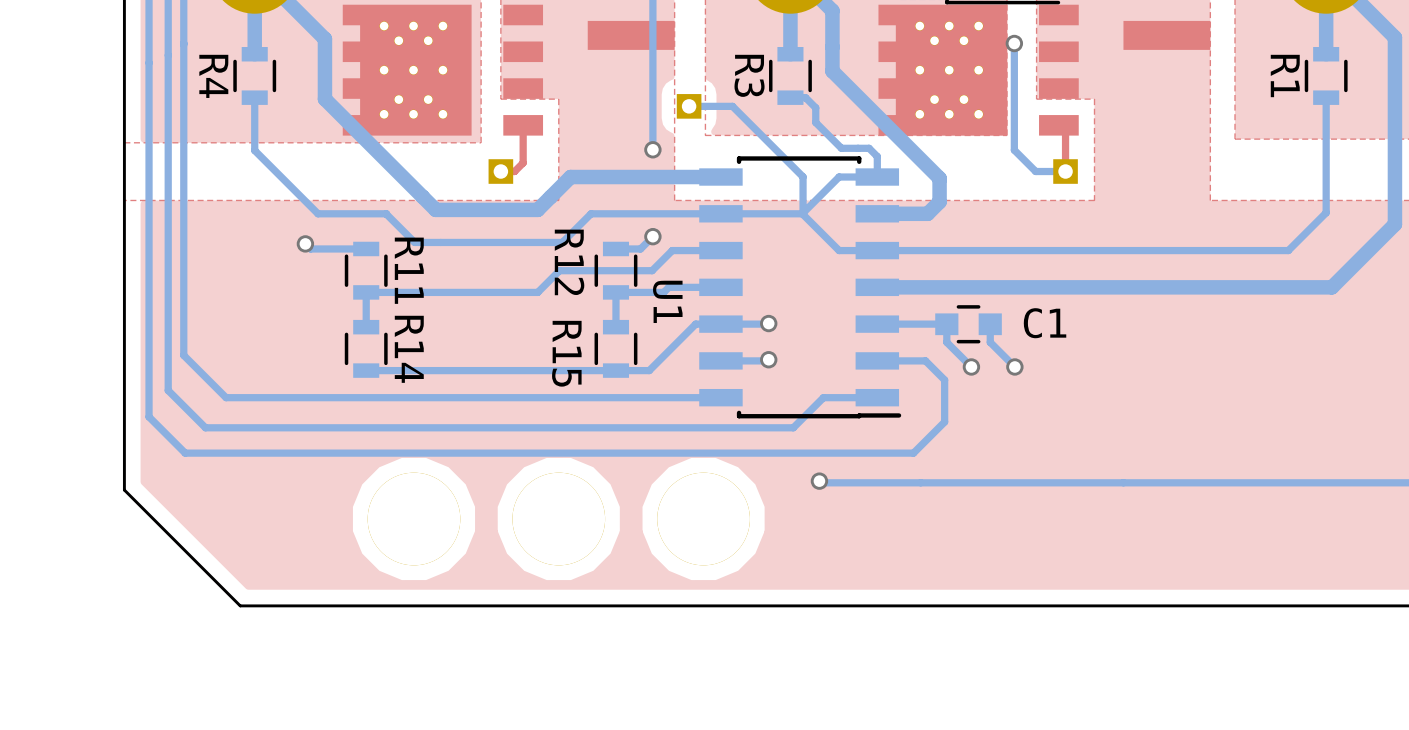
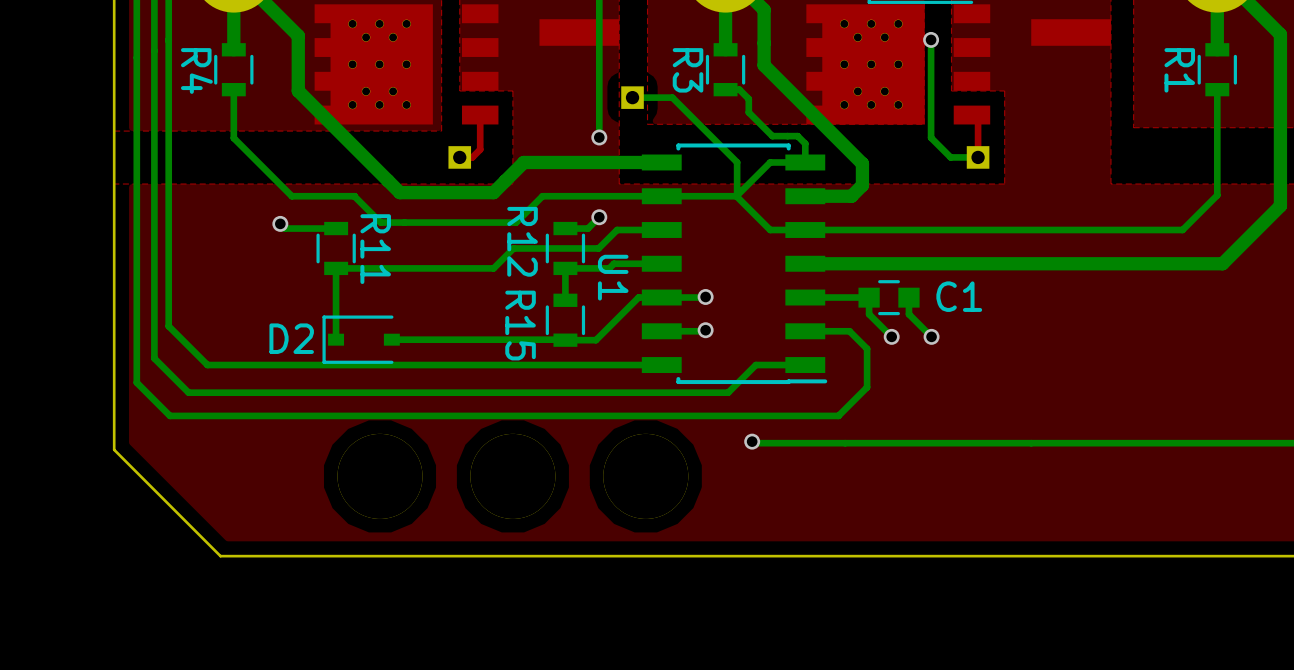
R14: (366, 348) -> none
D2: none -> (361, 339)
bottom track: (615, 370) (366, 370) -> (565, 340) (391, 339)

